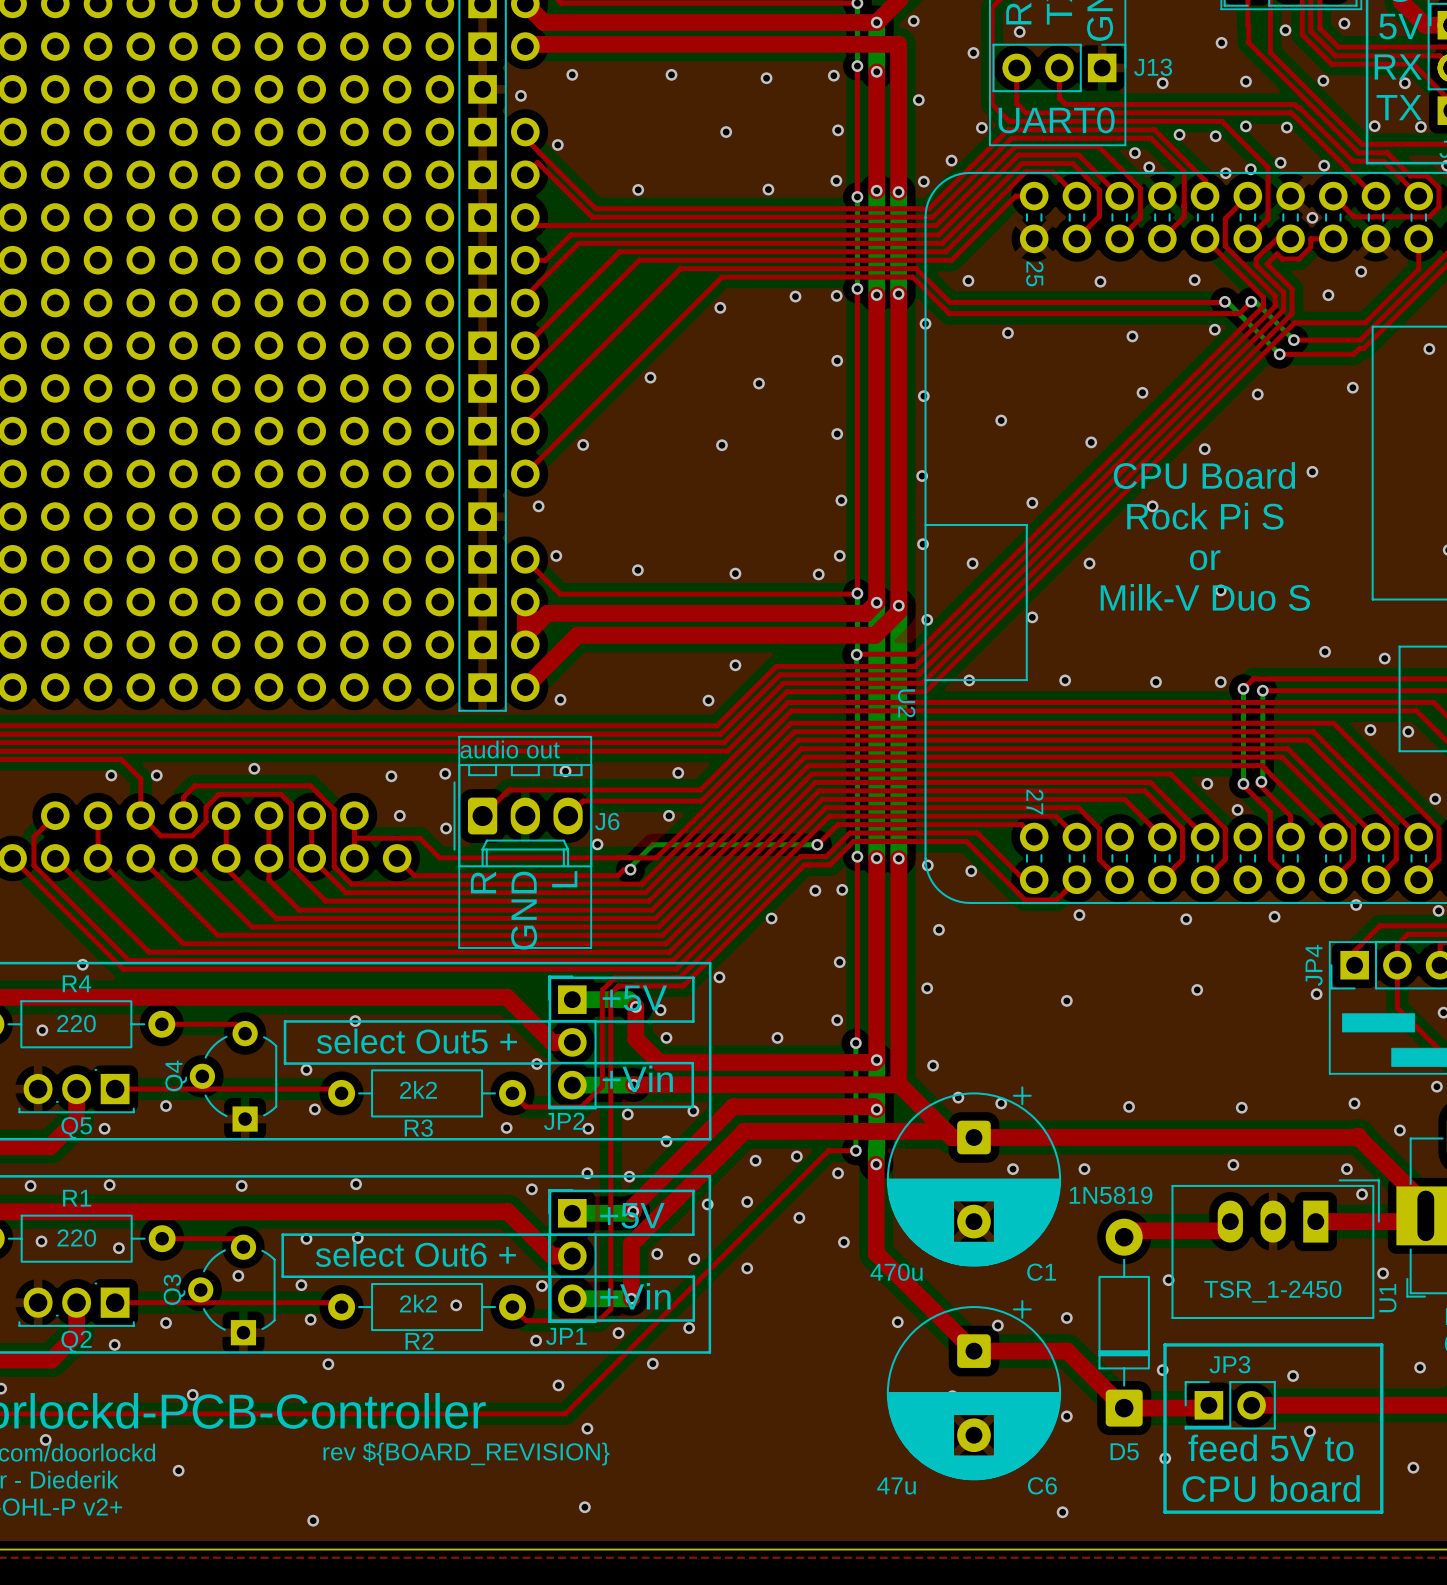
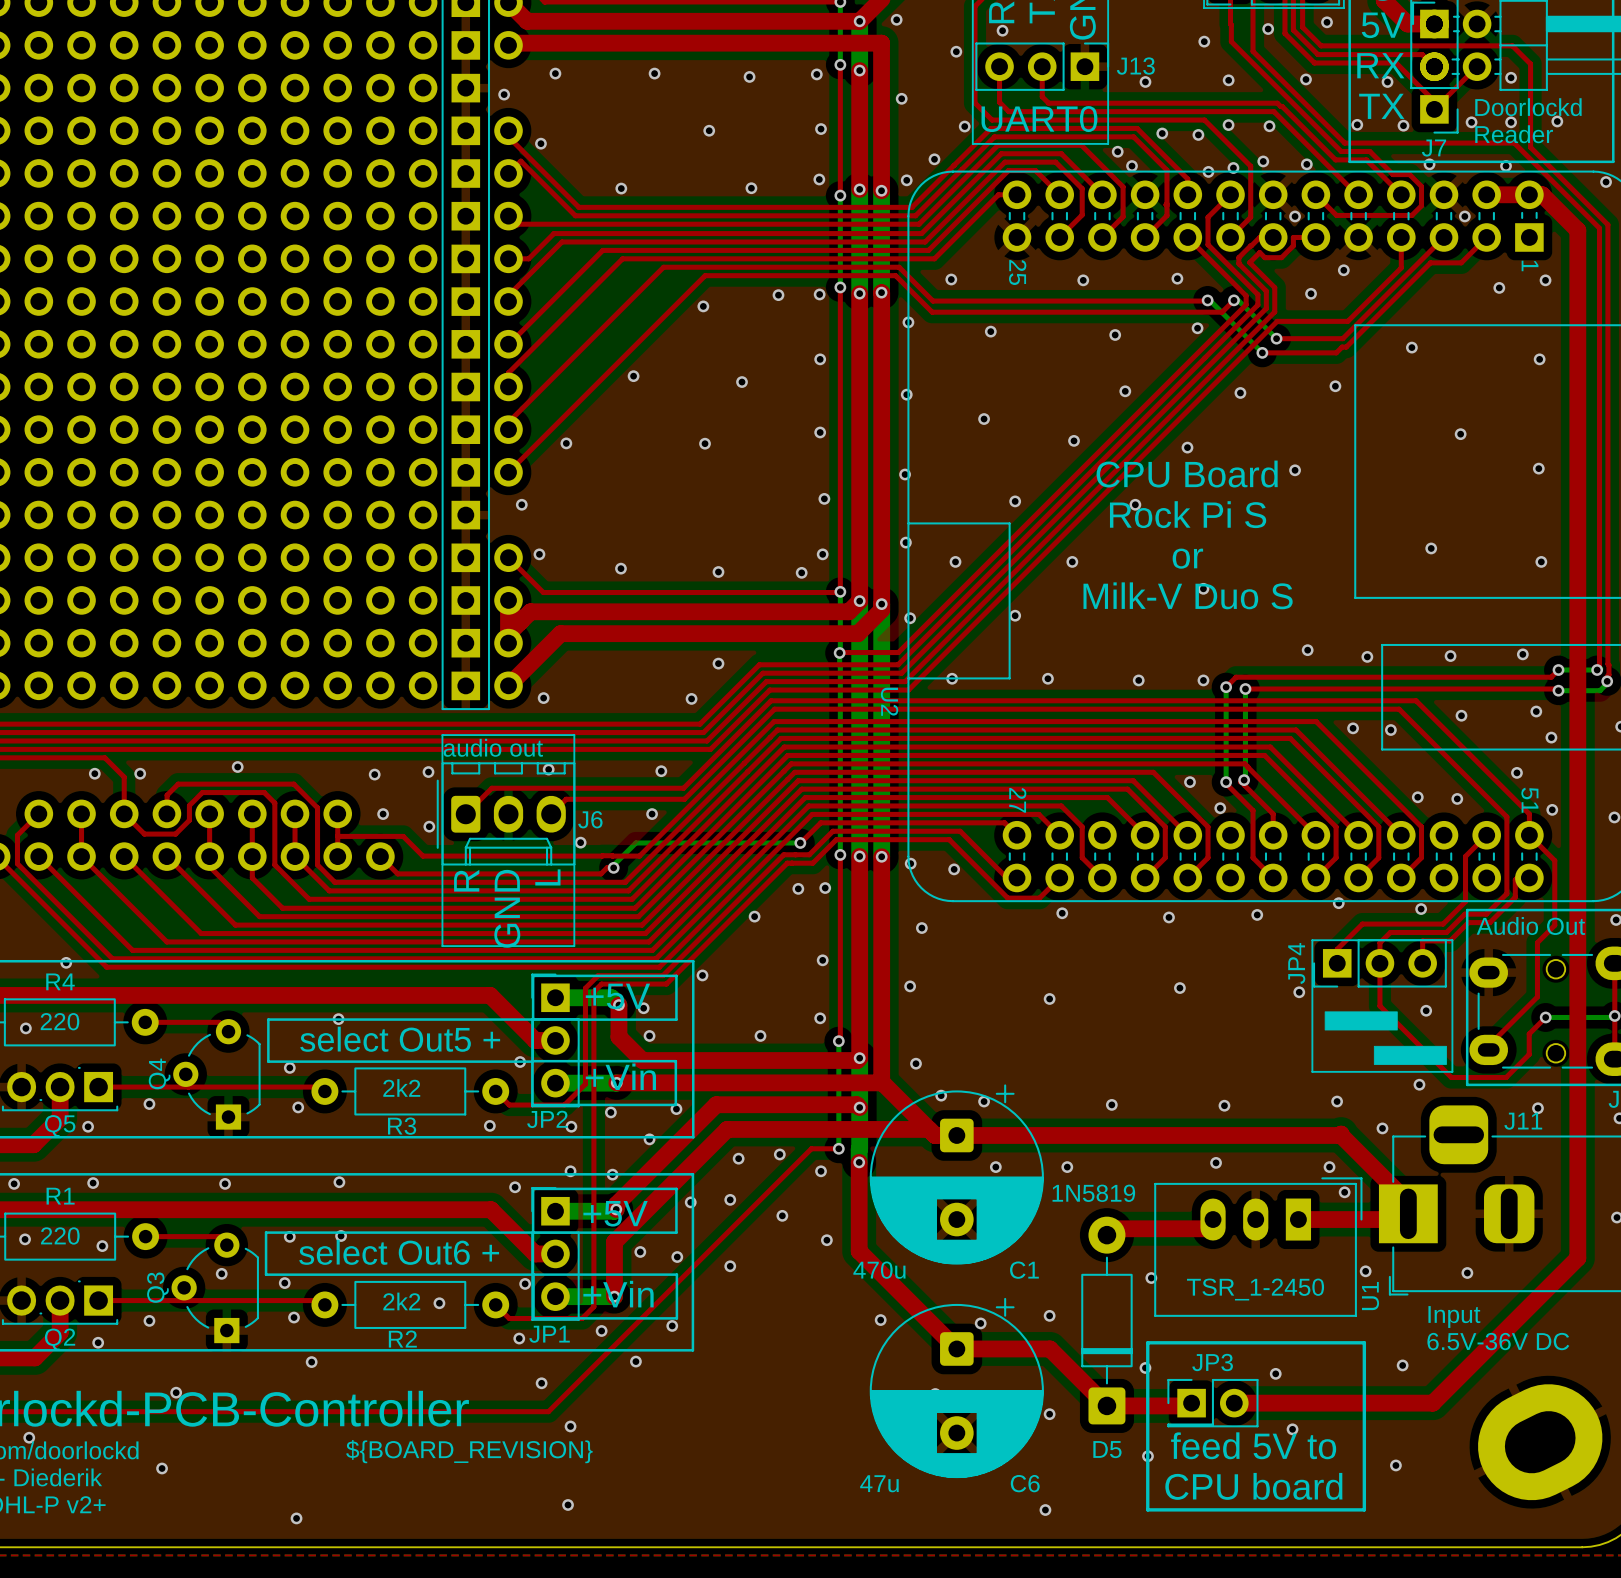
text: rev ${BOARD_REVISION} (466, 1453) -> ${BOARD_REVISION} (469, 1451)

